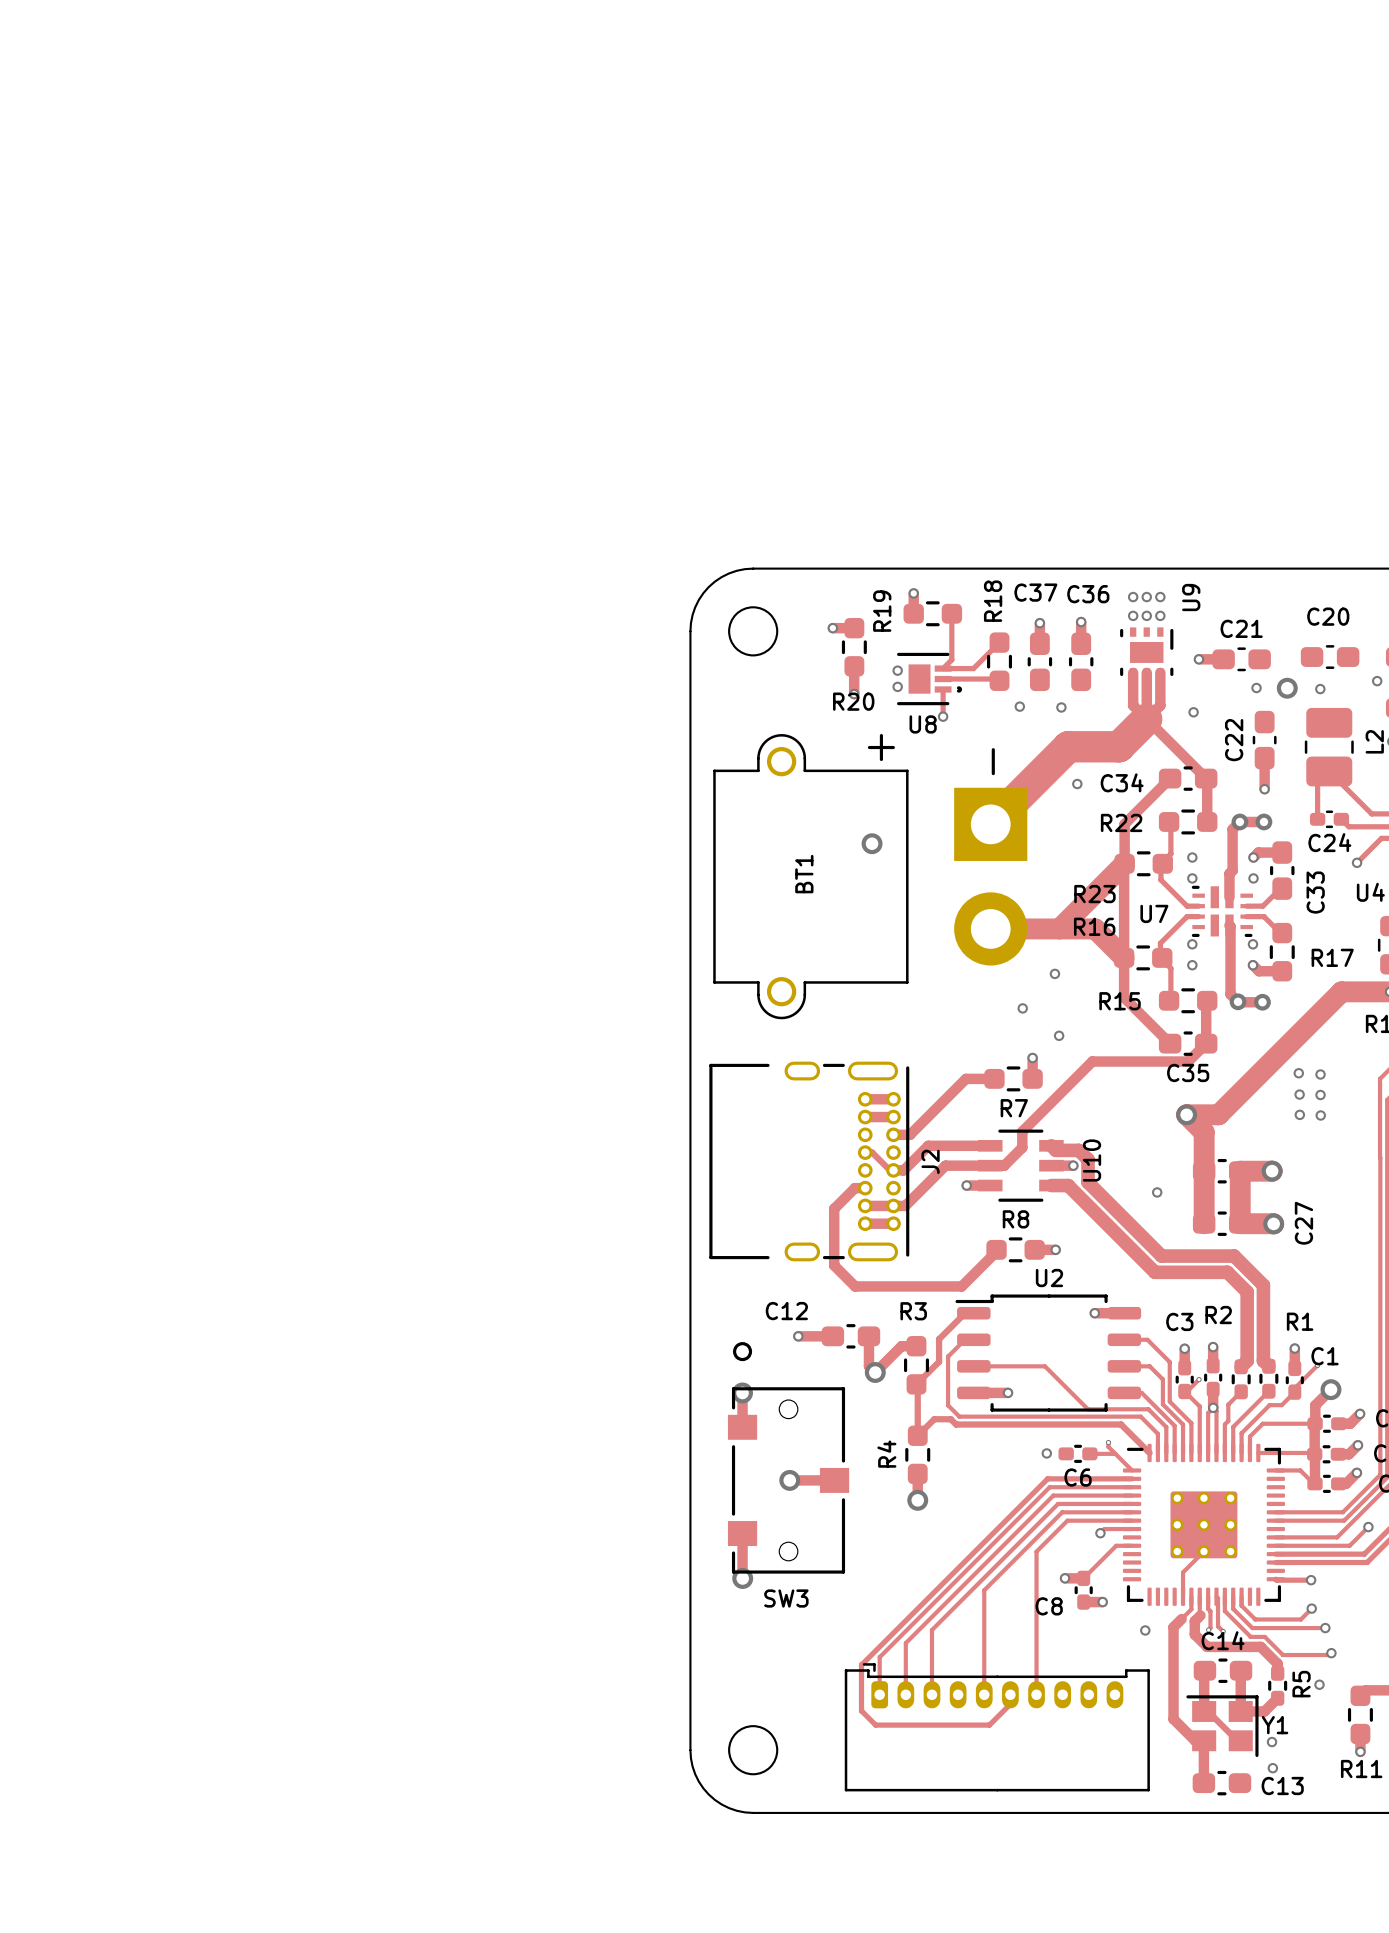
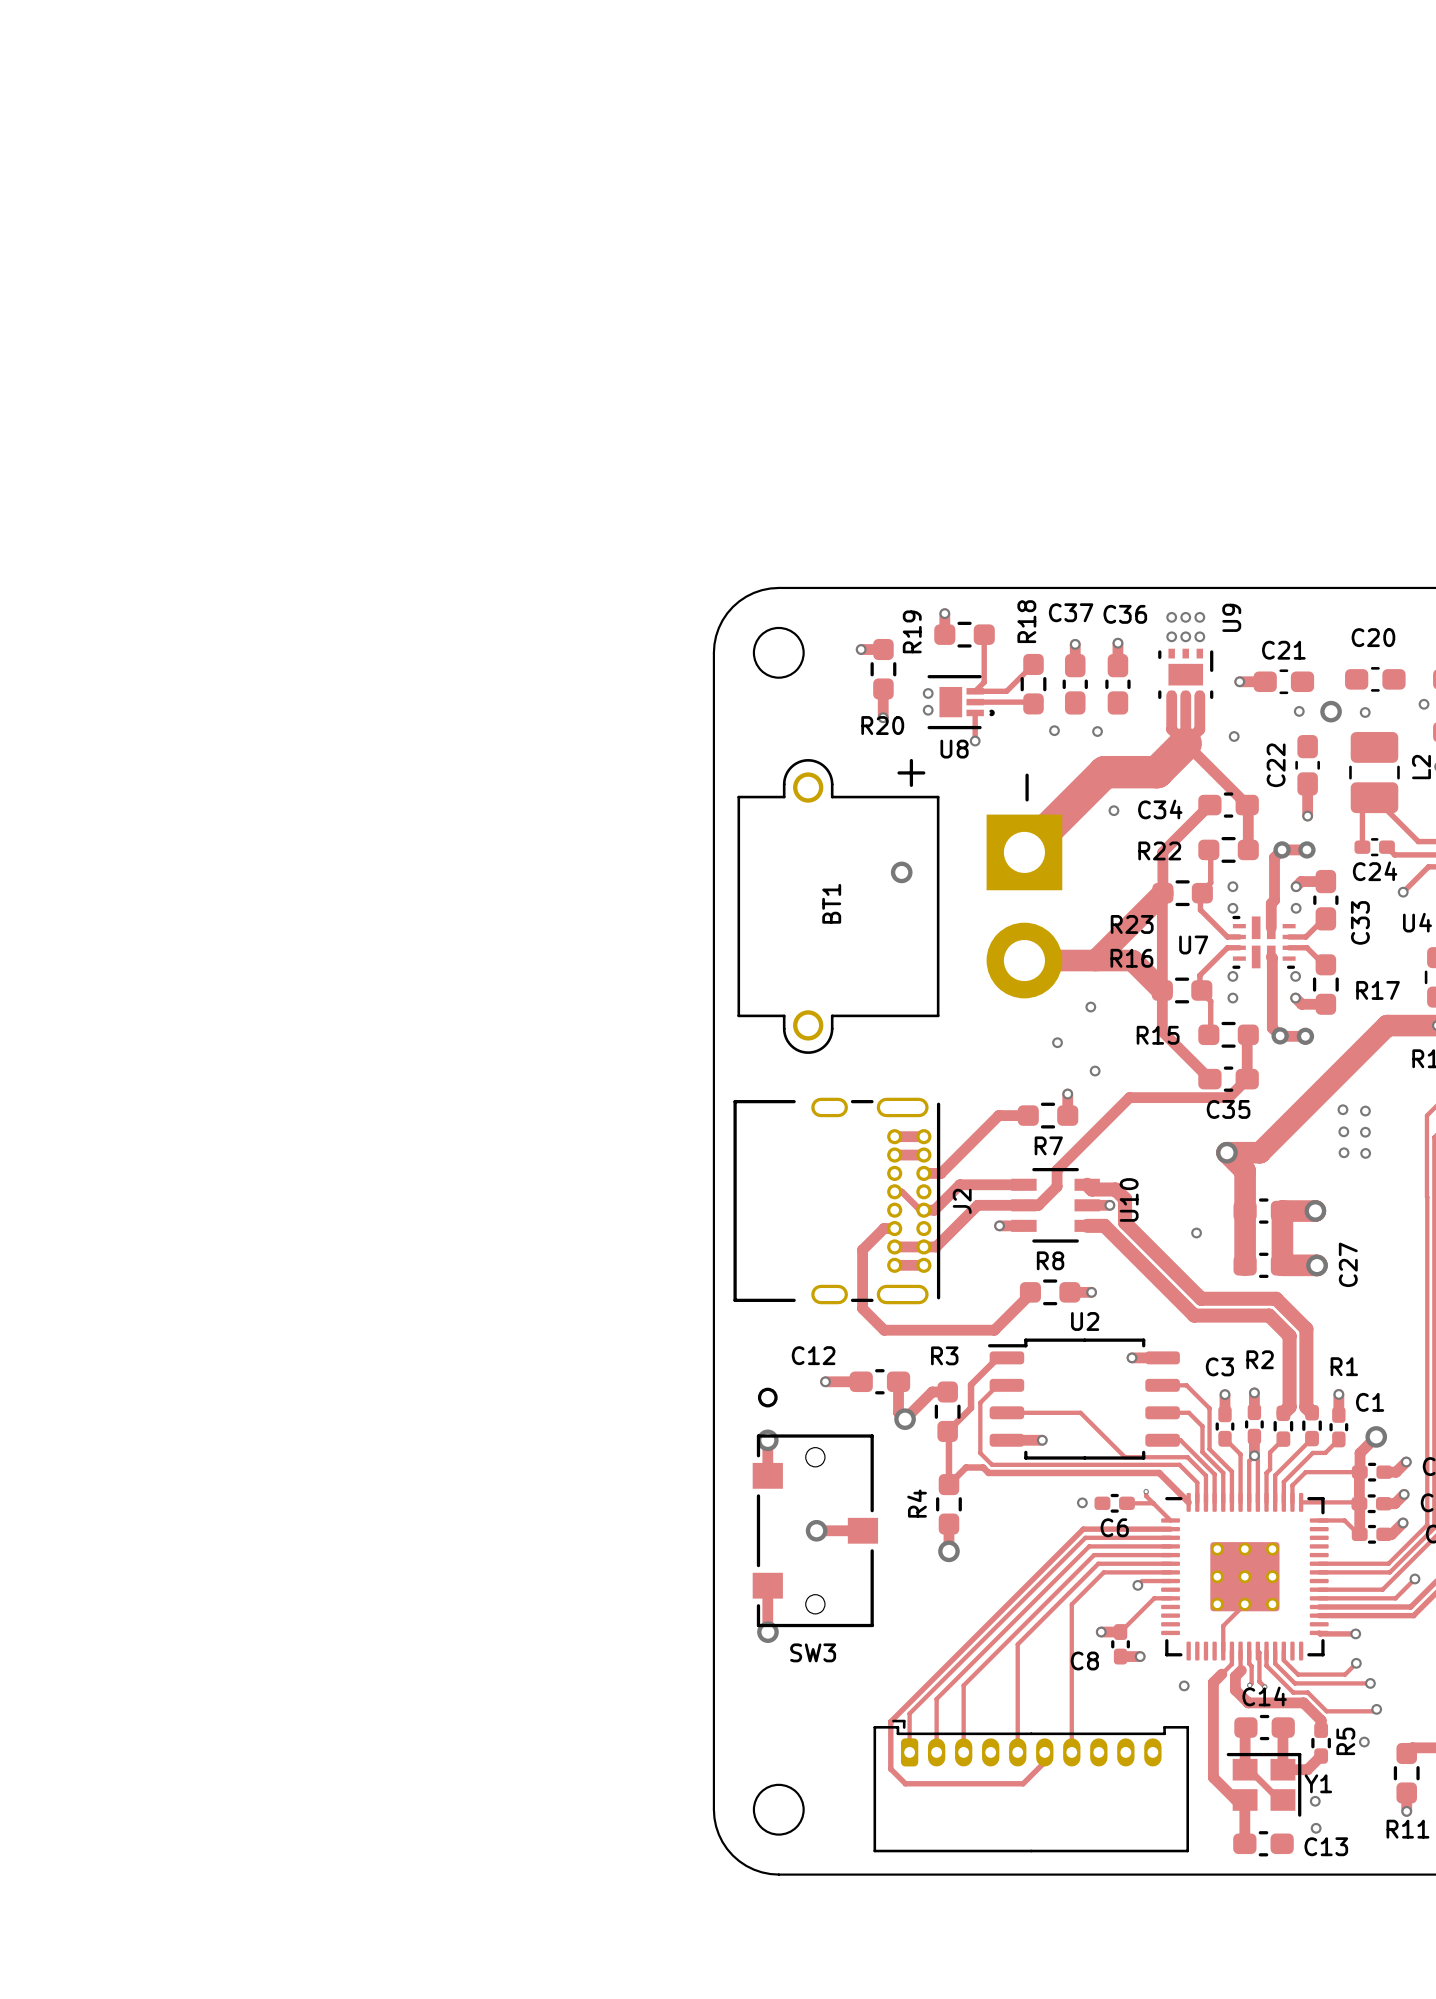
track: (1317, 1365) (1294, 1388) (1294, 1392) -> none
via: (1317, 1365) -> none
track: (1199, 1379) (1187, 1391) (1184, 1391) -> none
via: (1199, 1379) -> none

